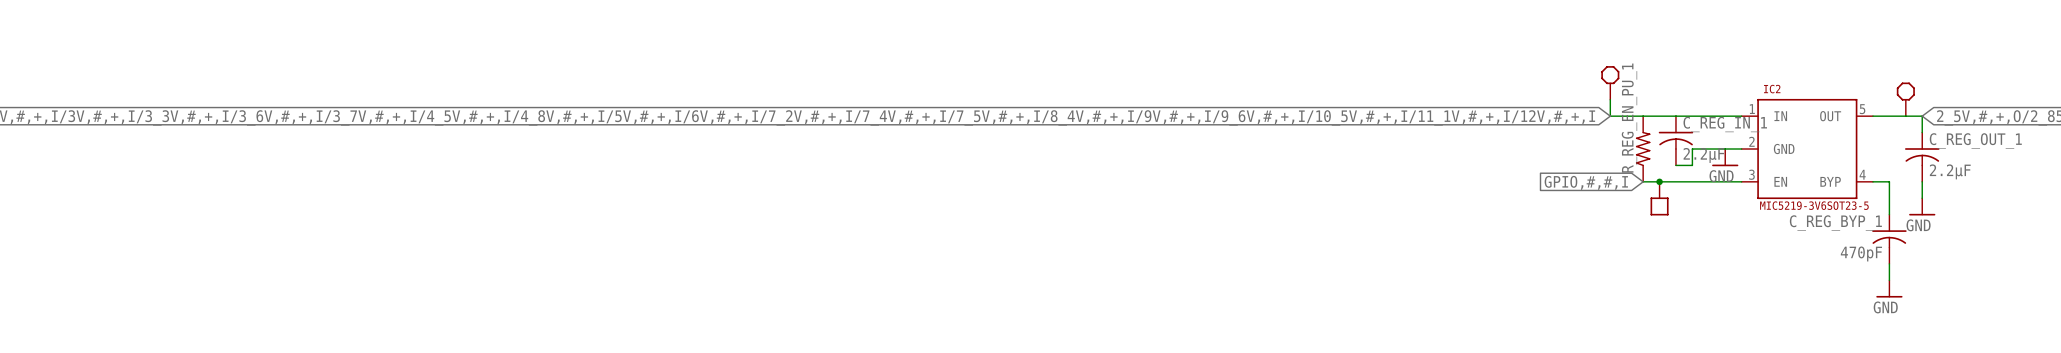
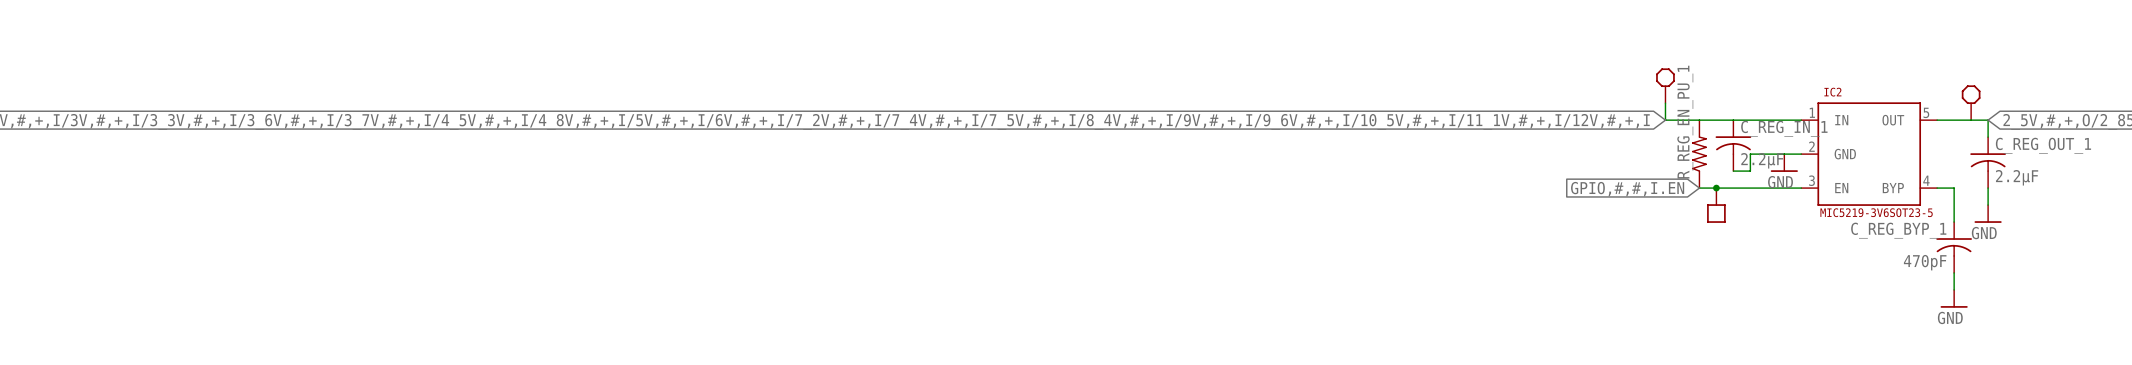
global label: GPIO,#,#,I (1586, 182) -> GPIO,#,#,I.EN (1627, 189)

